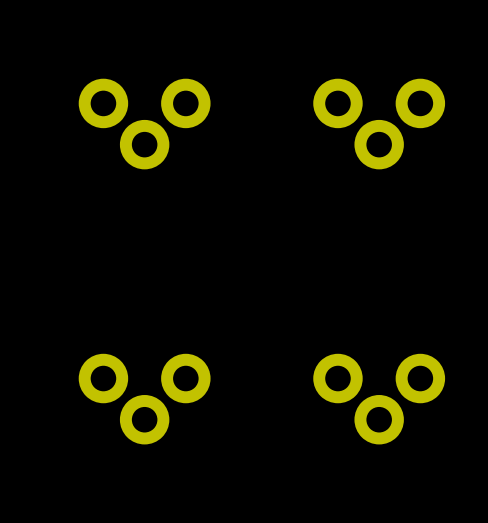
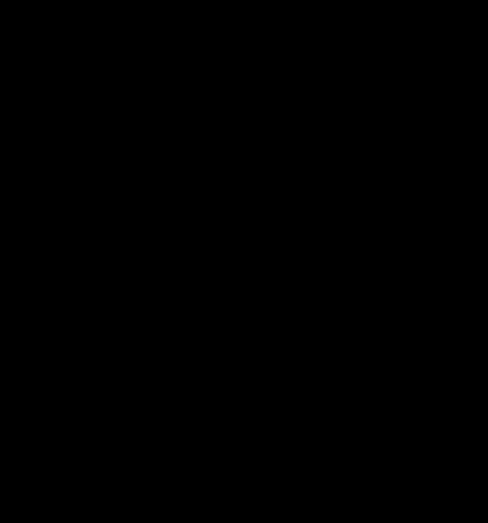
part: (144, 124) -> none
part: (379, 124) -> none
part: (144, 399) -> none
part: (379, 399) -> none

